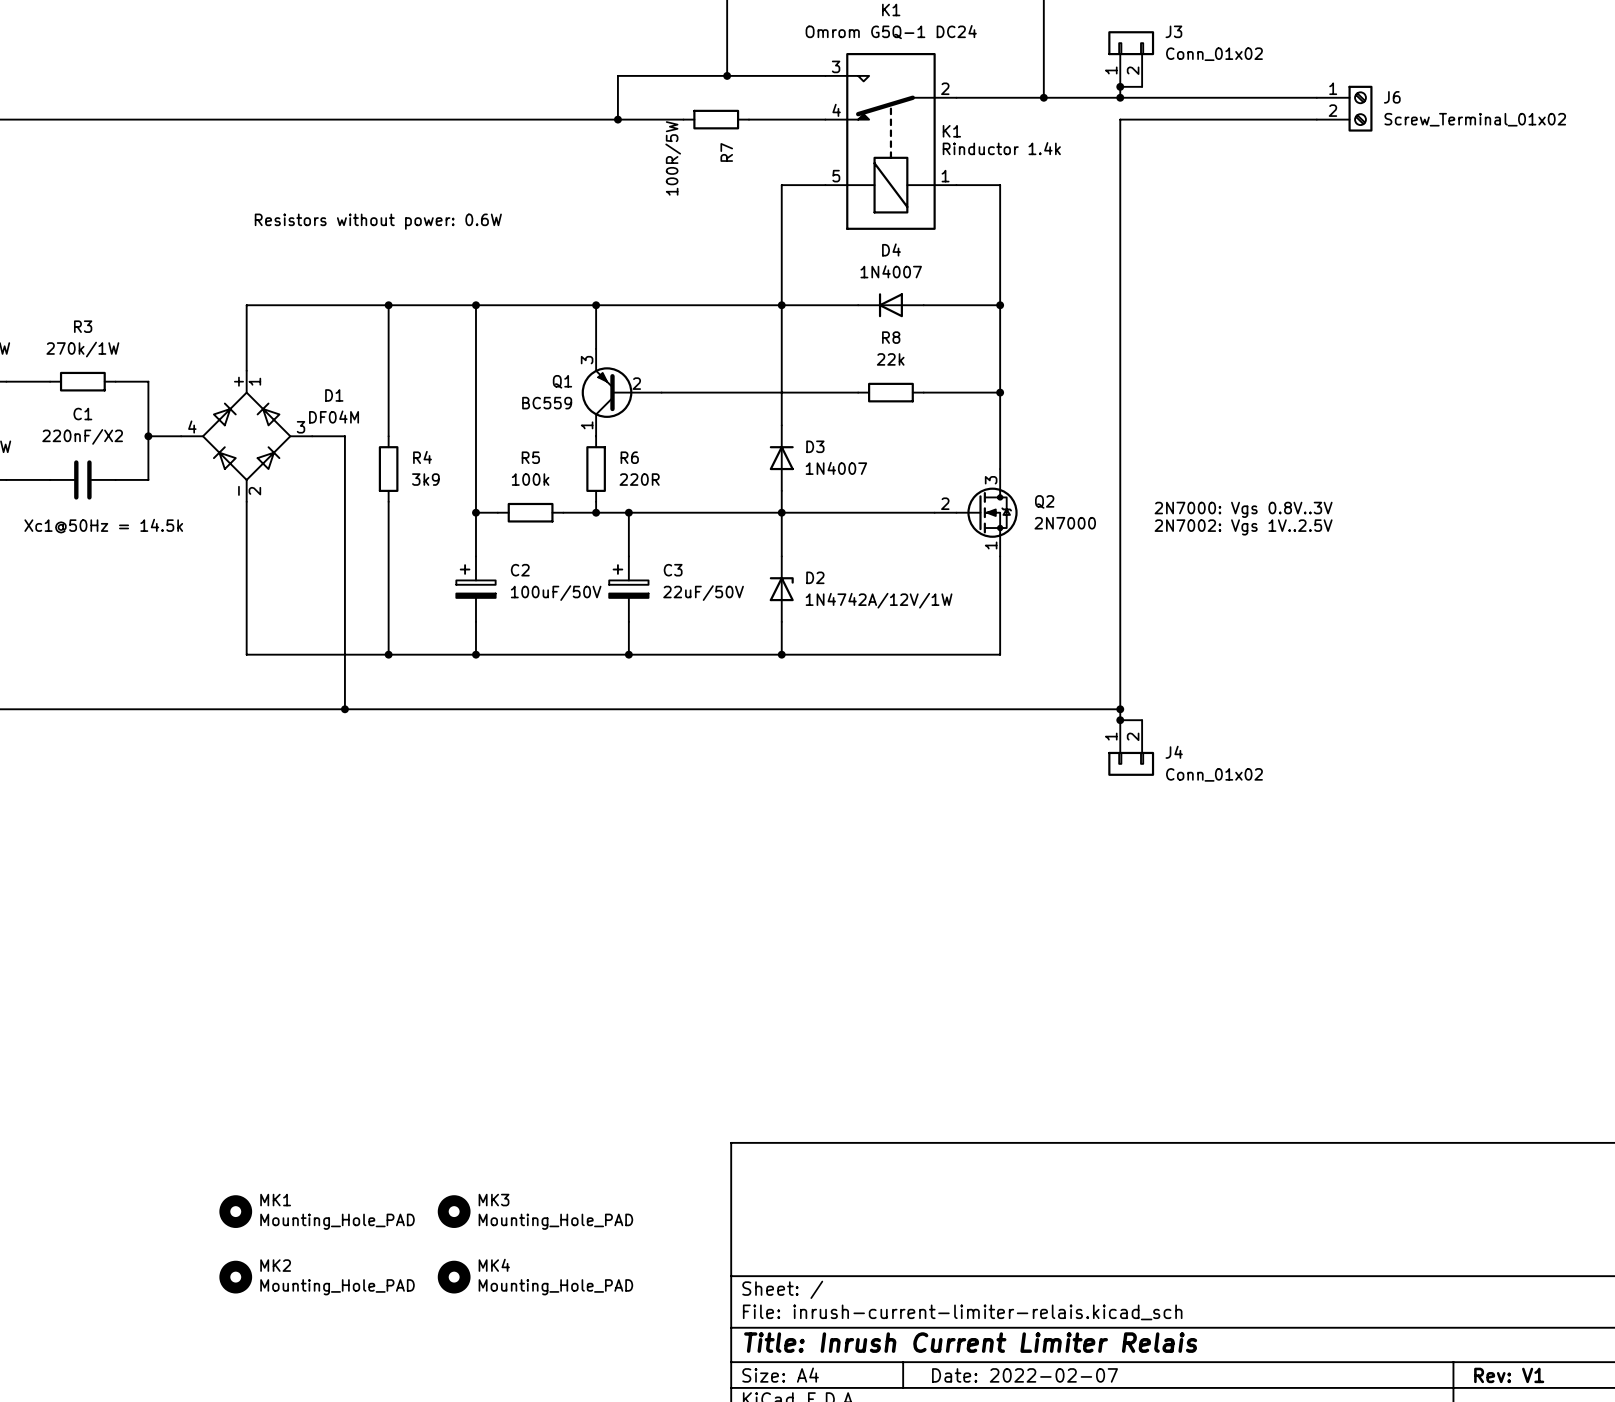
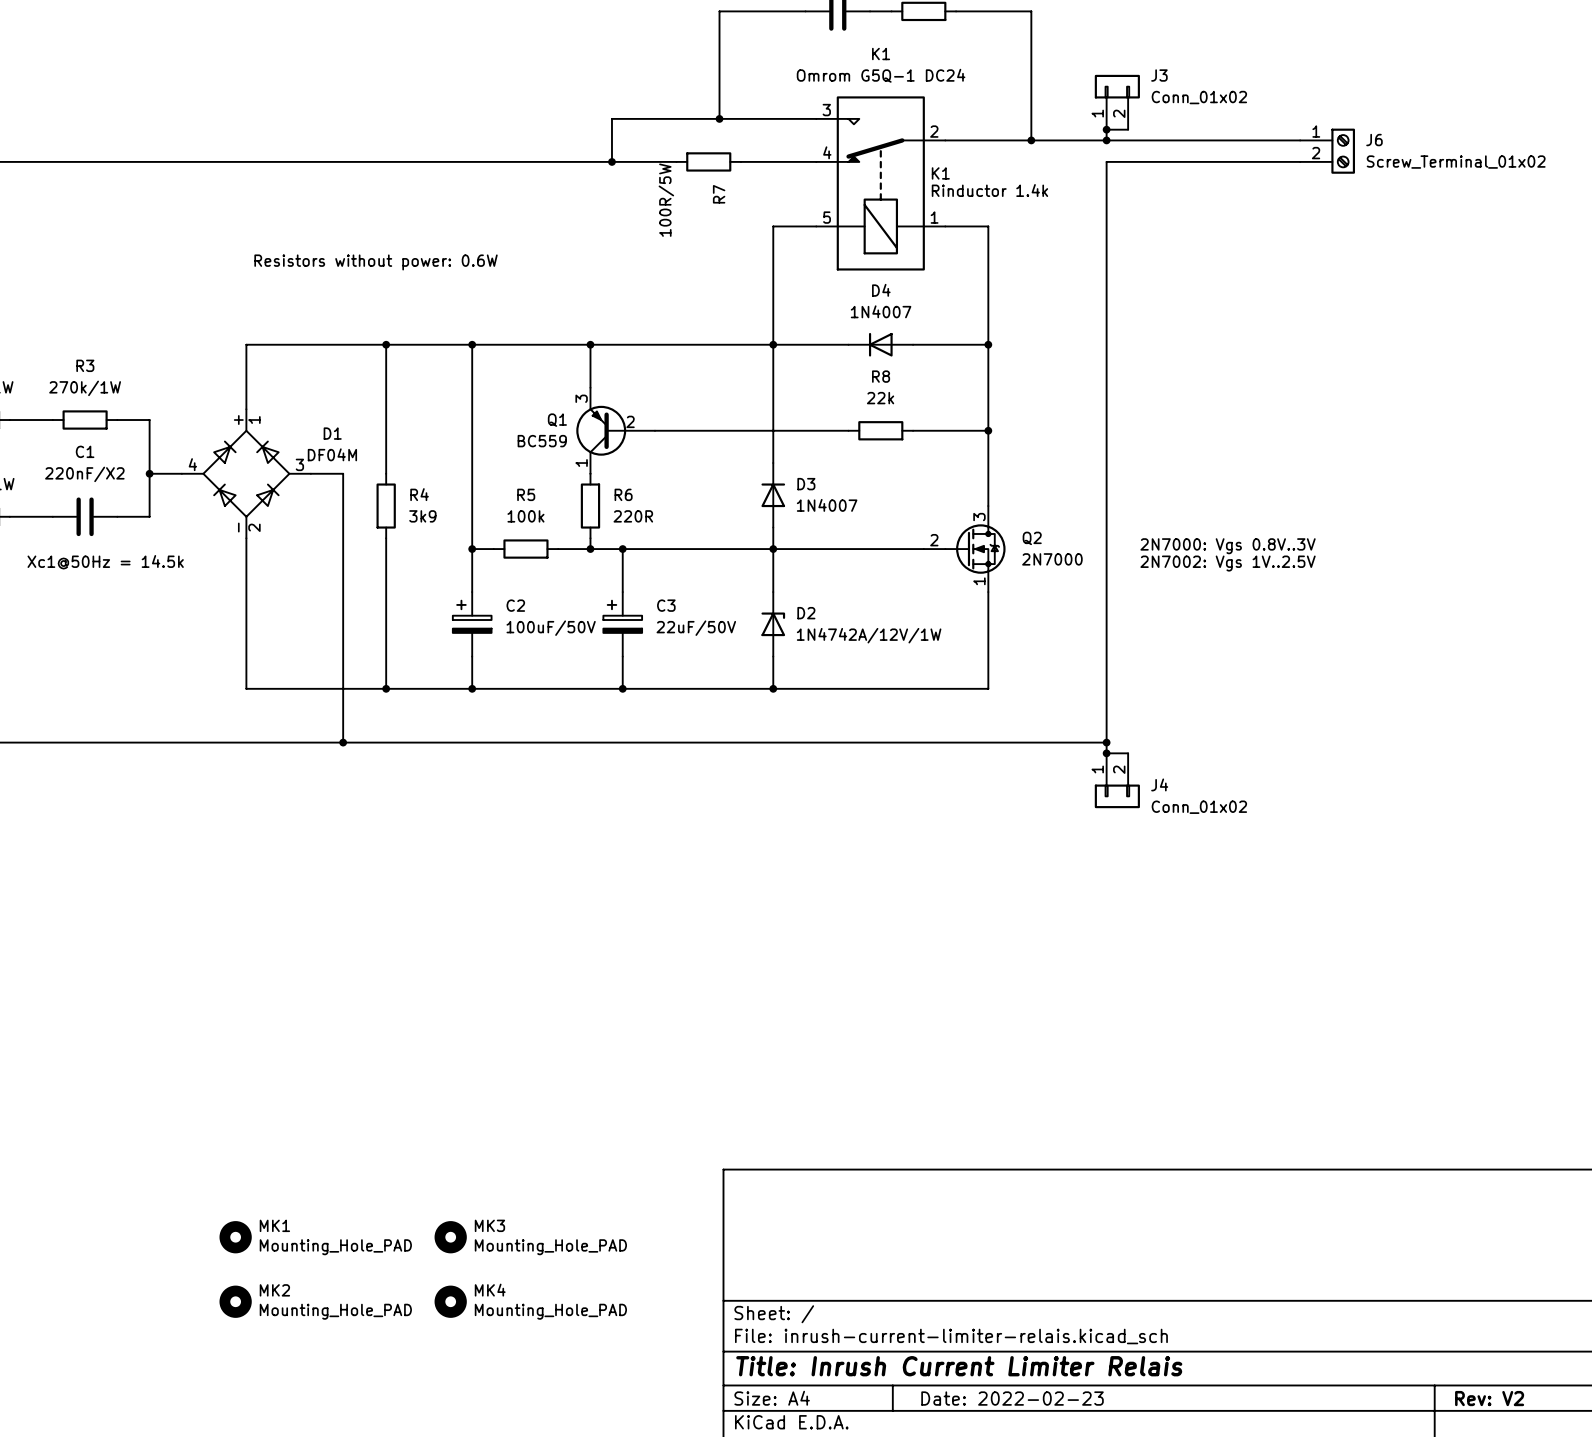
title block: Date: 2022-02-07 (1025, 1375) -> Date: 2022-02-23 (1012, 1398)
title block: Rev: V1 (1509, 1375) -> Rev: V2 (1489, 1398)

